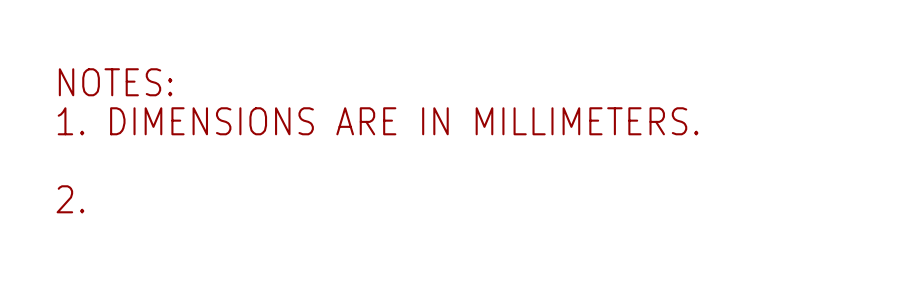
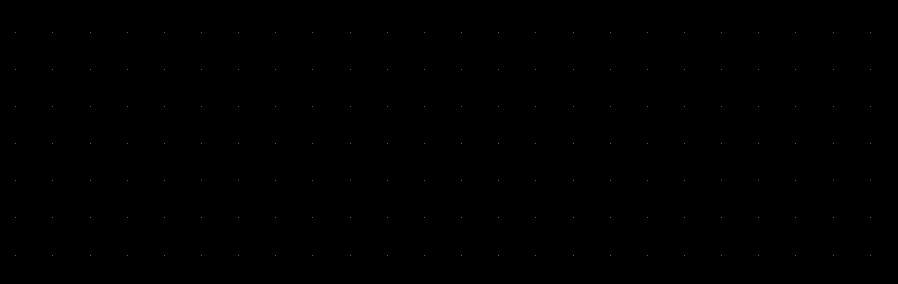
text: NOTES: (115, 82) -> none
text: 1. DIMENSIONS ARE IN MILLIMETERS. (378, 121) -> none
text: 2. (70, 199) -> none

